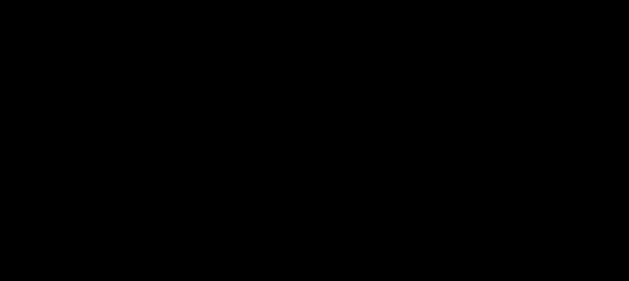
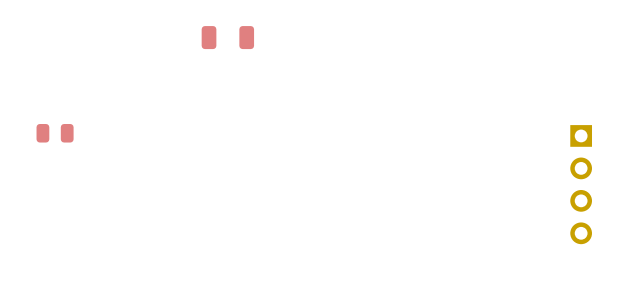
part: none -> (227, 37)
part: none -> (55, 133)
part: none -> (581, 184)

